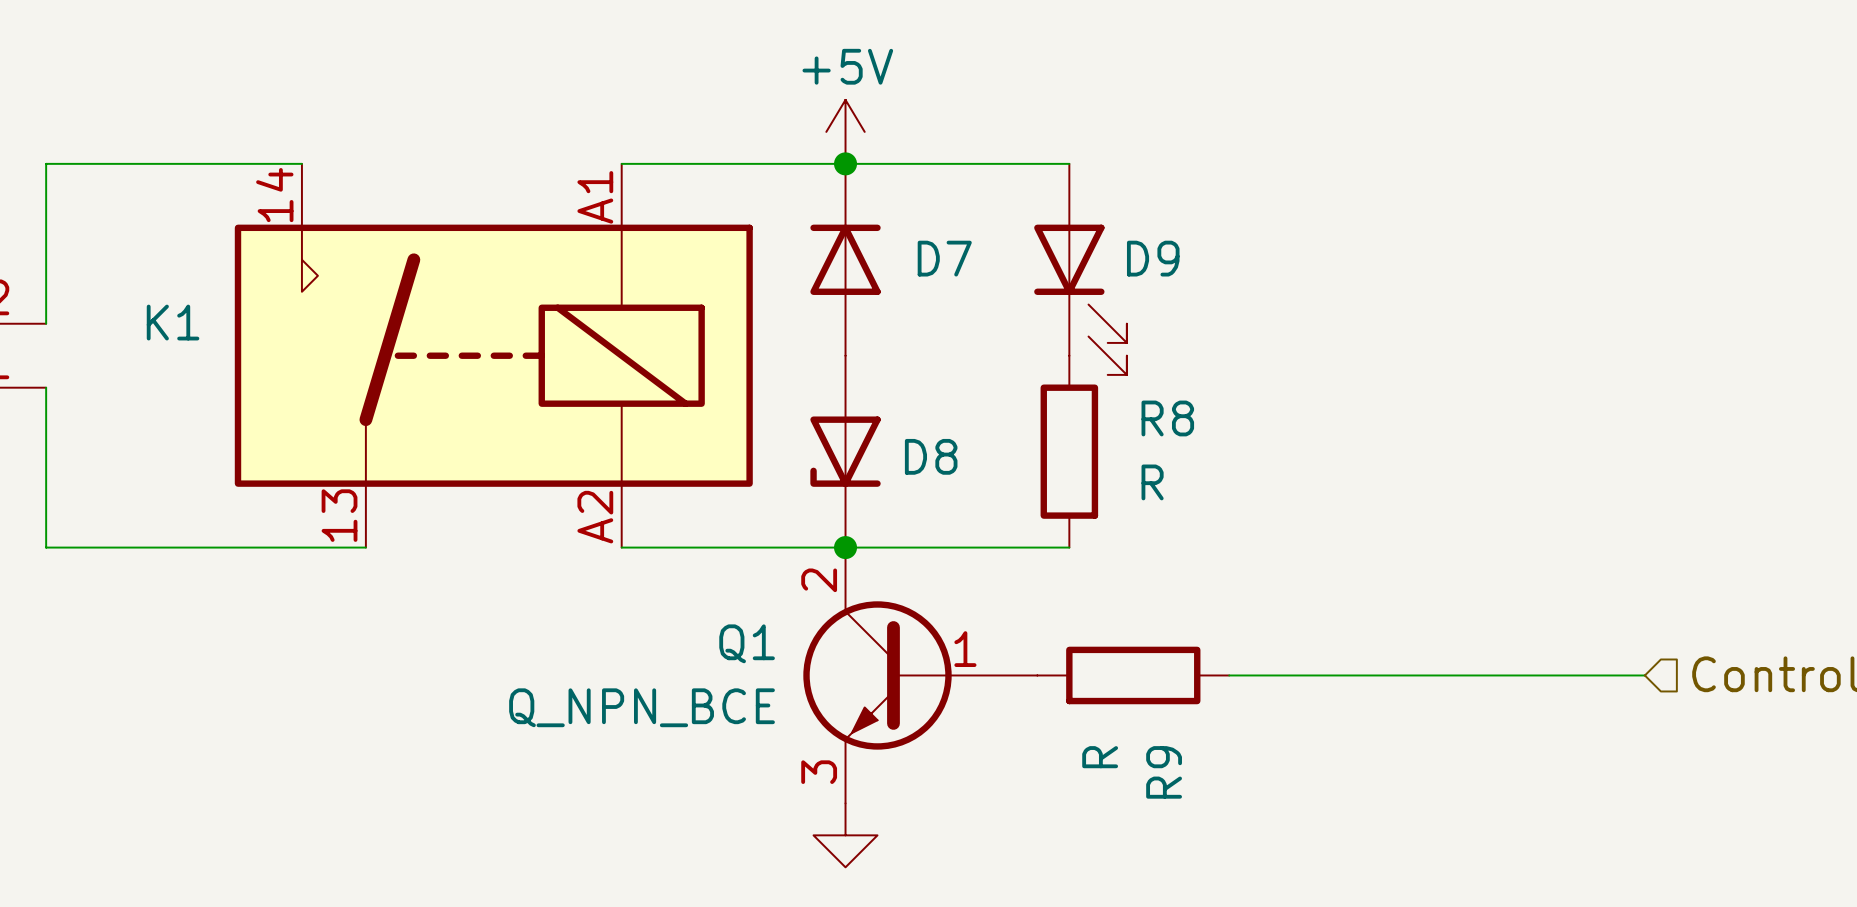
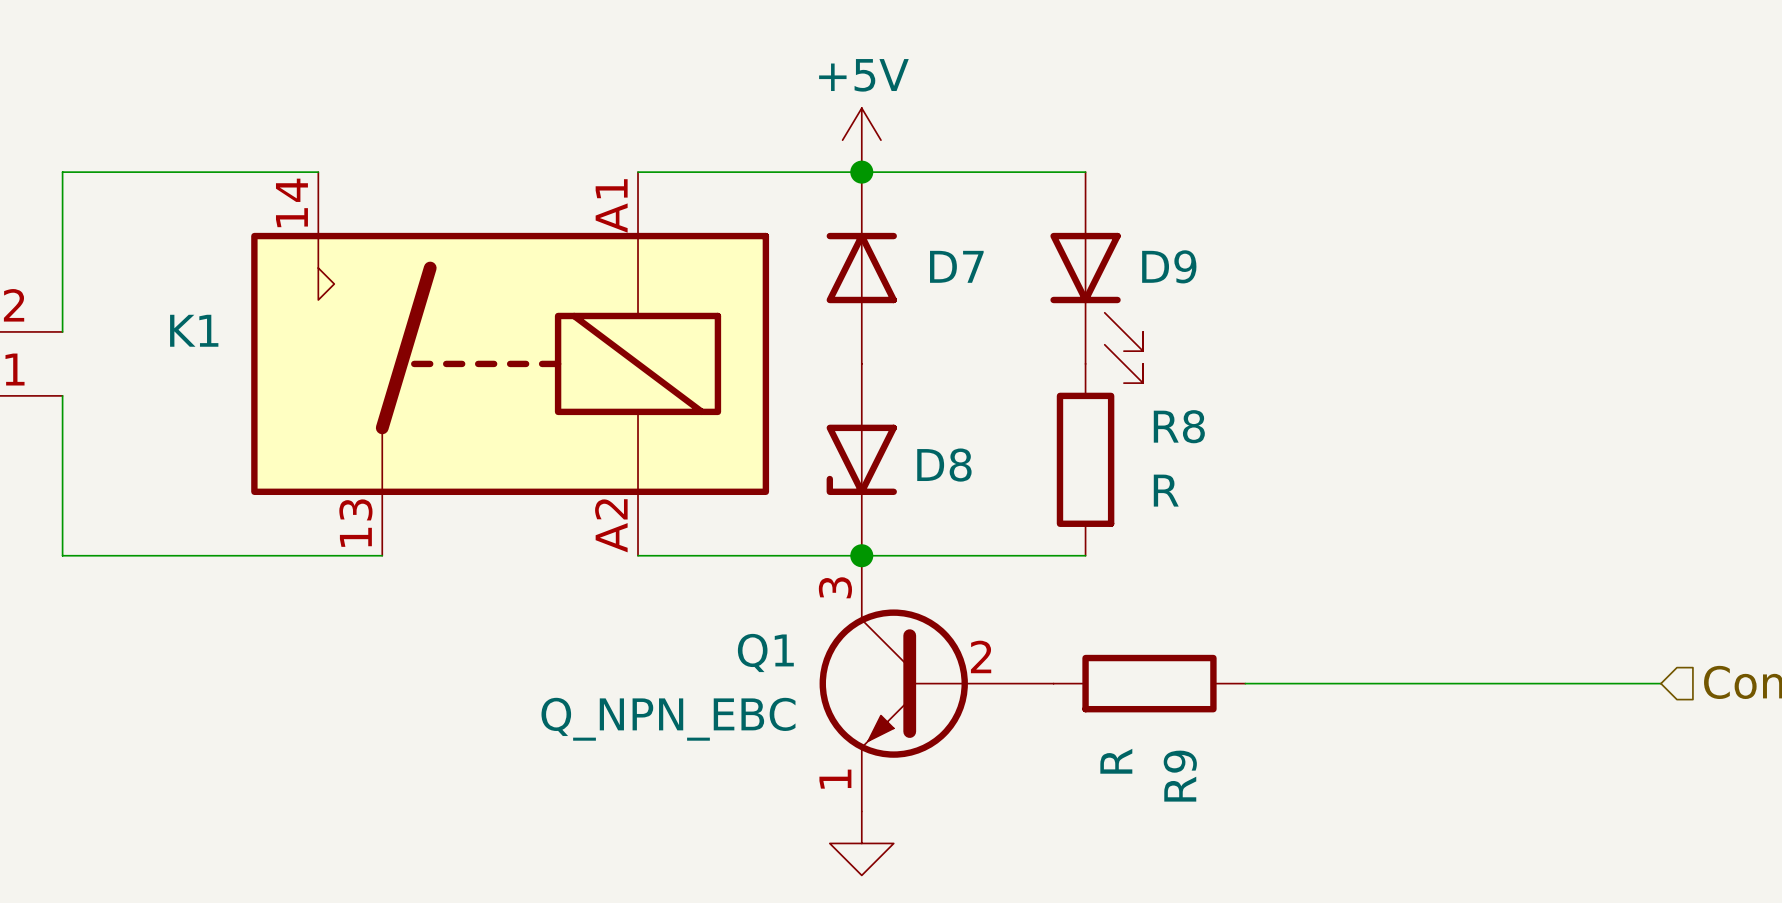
Q1 pin number: 2 (819, 580) -> 3 (835, 587)
Q1 pin number: 1 (965, 649) -> 2 (981, 656)
Q1 value: Q_NPN_BCE (642, 707) -> Q_NPN_EBC (668, 719)
Q1 pin number: 3 (819, 772) -> 1 (835, 779)

